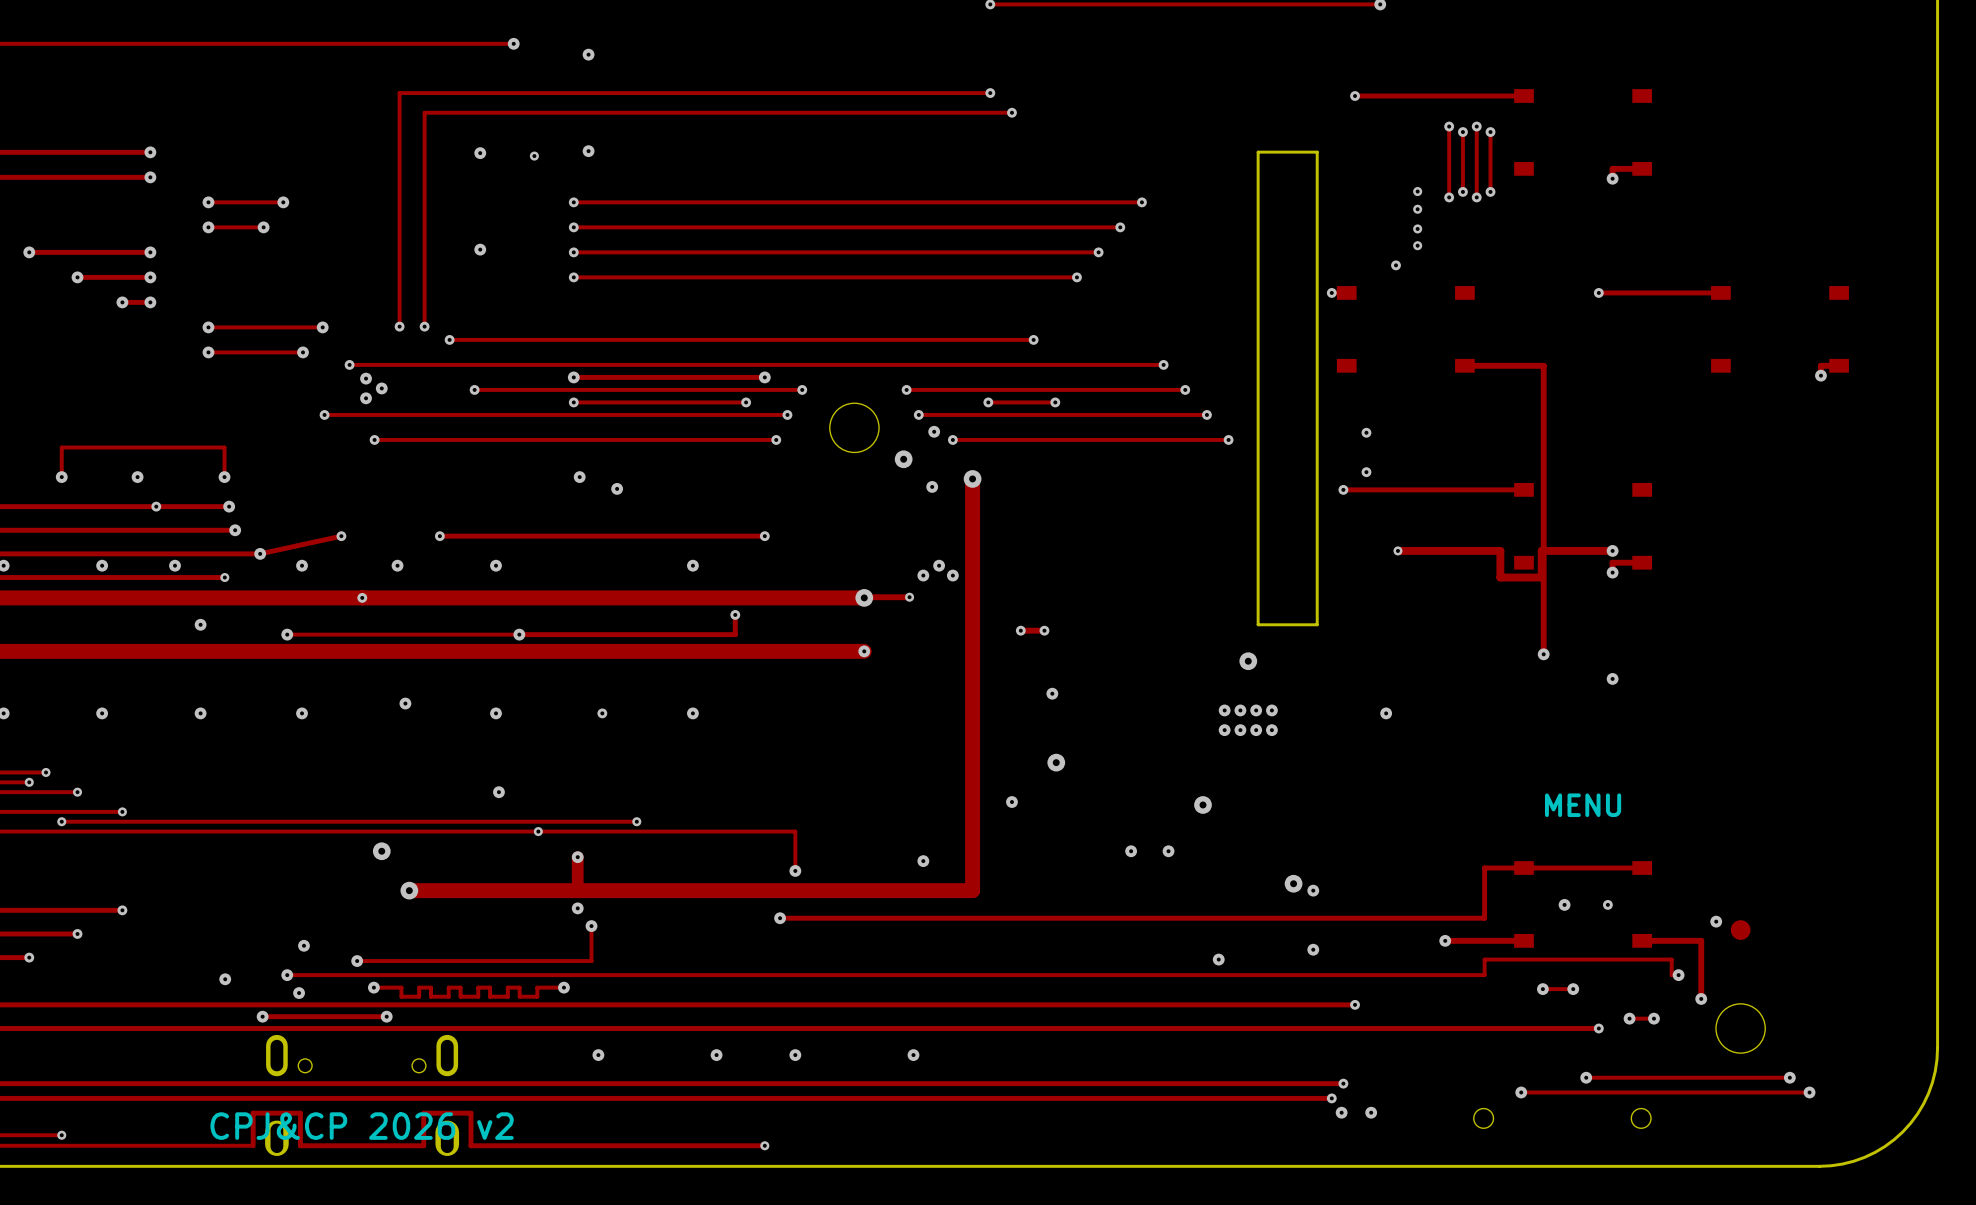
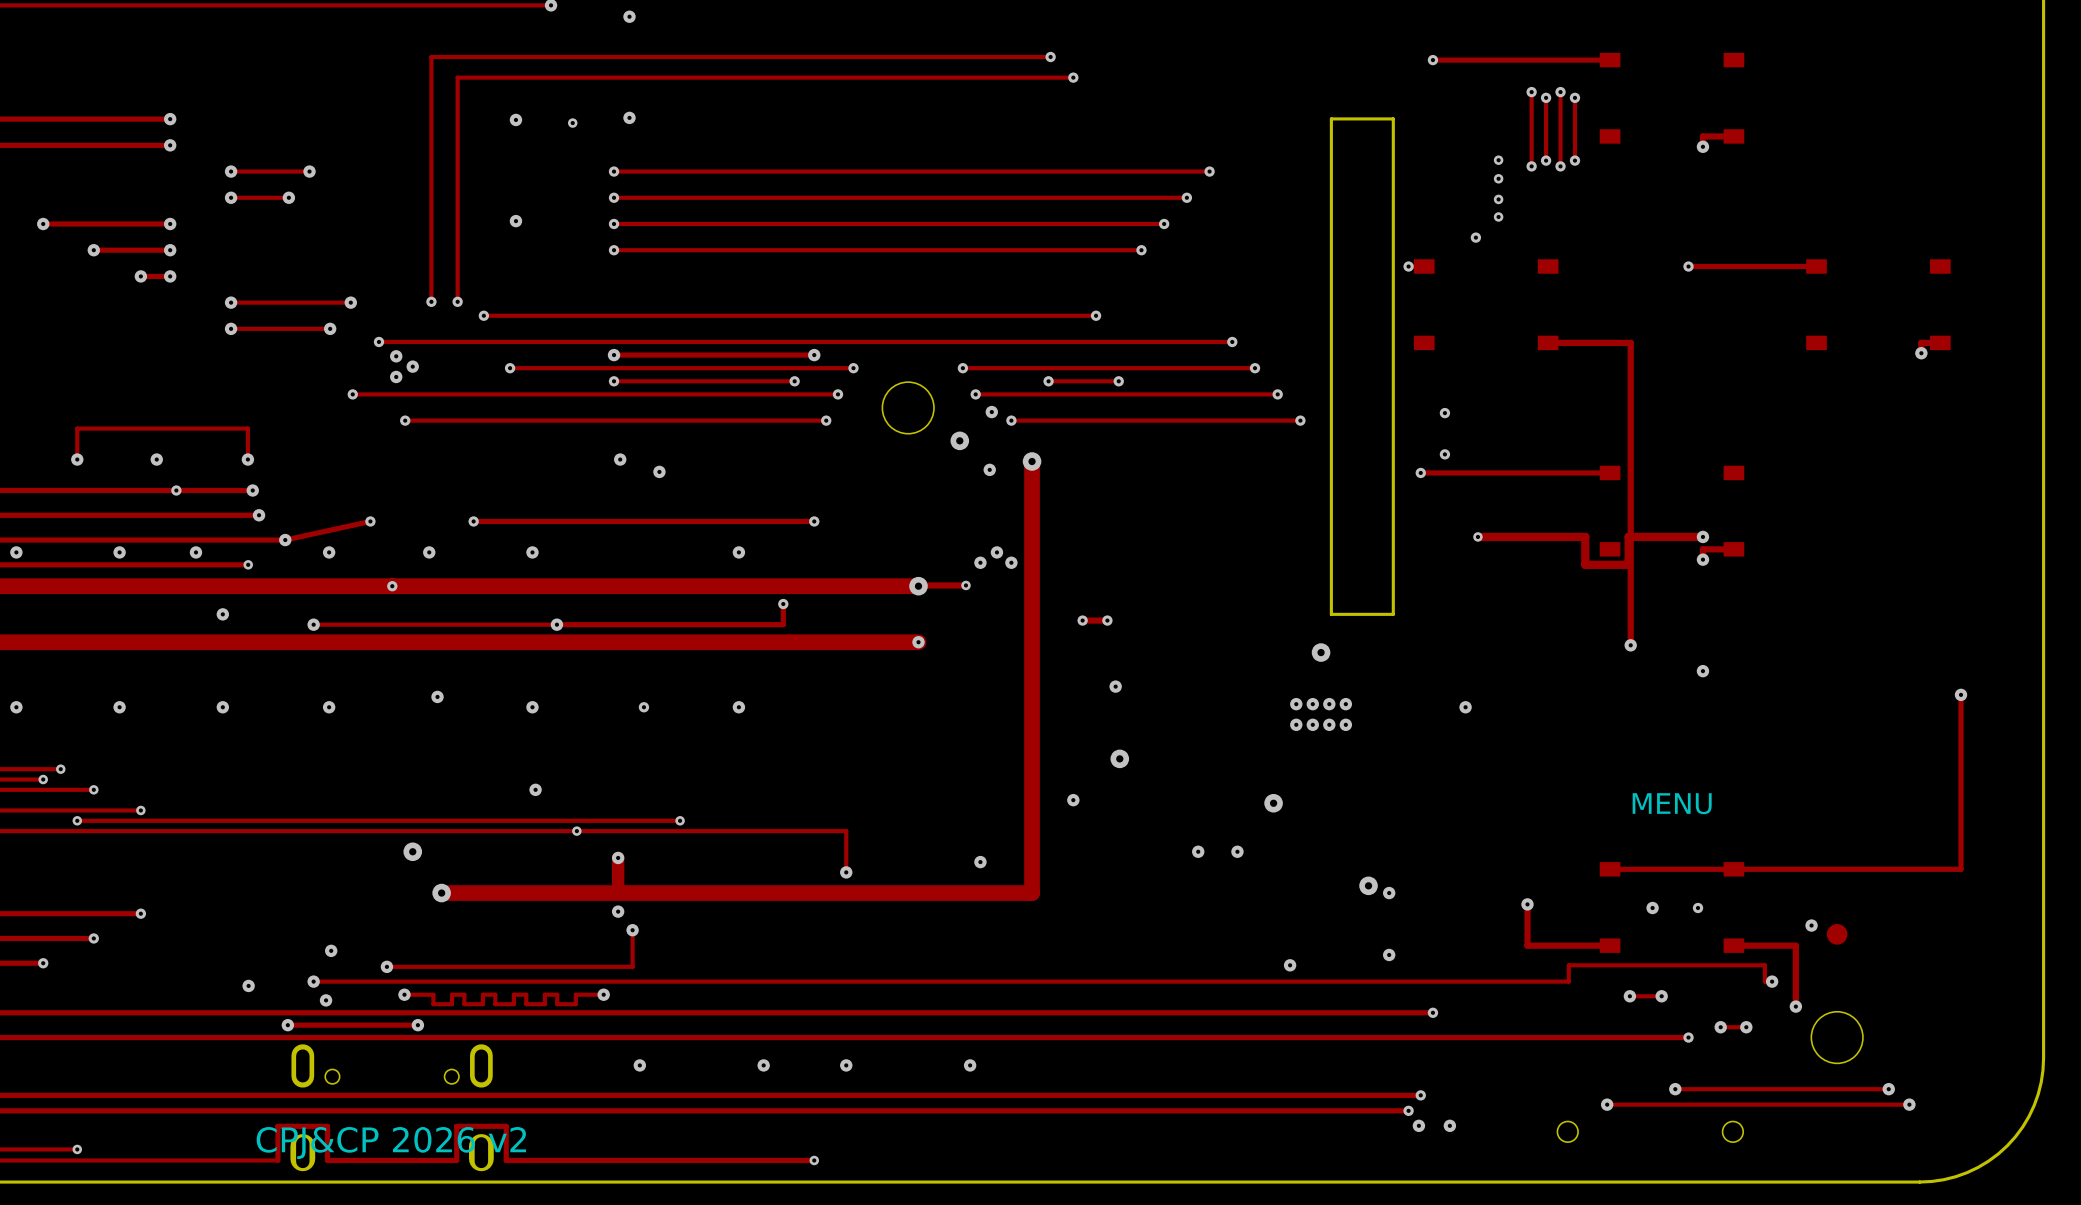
track: none -> (1961, 694) (1961, 869) (1733, 869)
via: none -> (1961, 694)
track: (1523, 867) (1484, 867) (1484, 918) (780, 918) -> none
track: none -> (1527, 904) (1527, 945)
via: (780, 918) -> none
via position: (1445, 940) -> (1527, 904)

